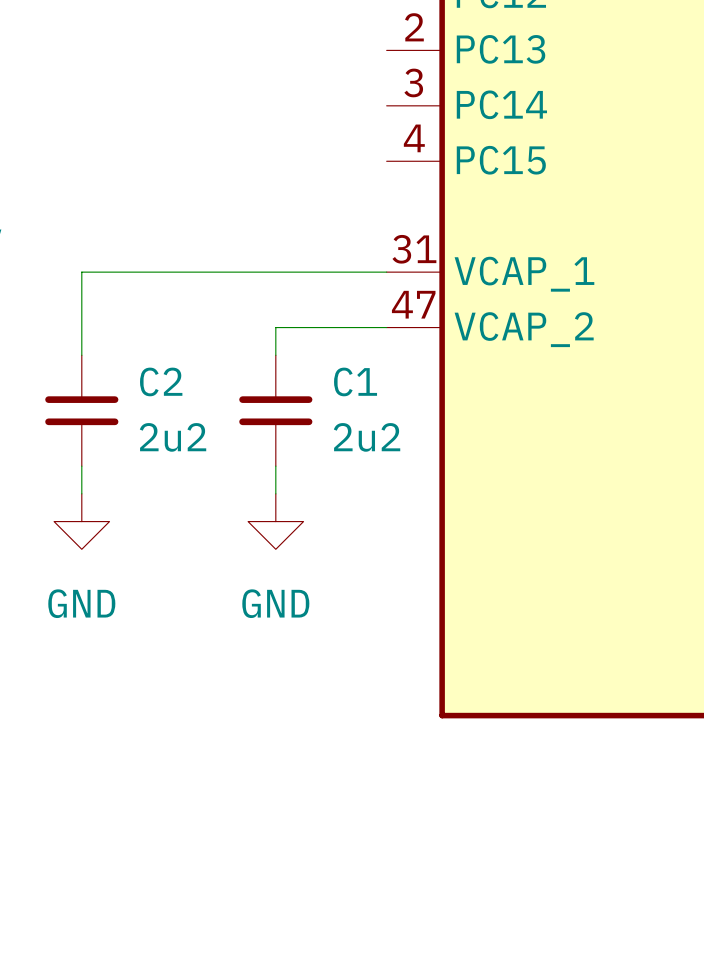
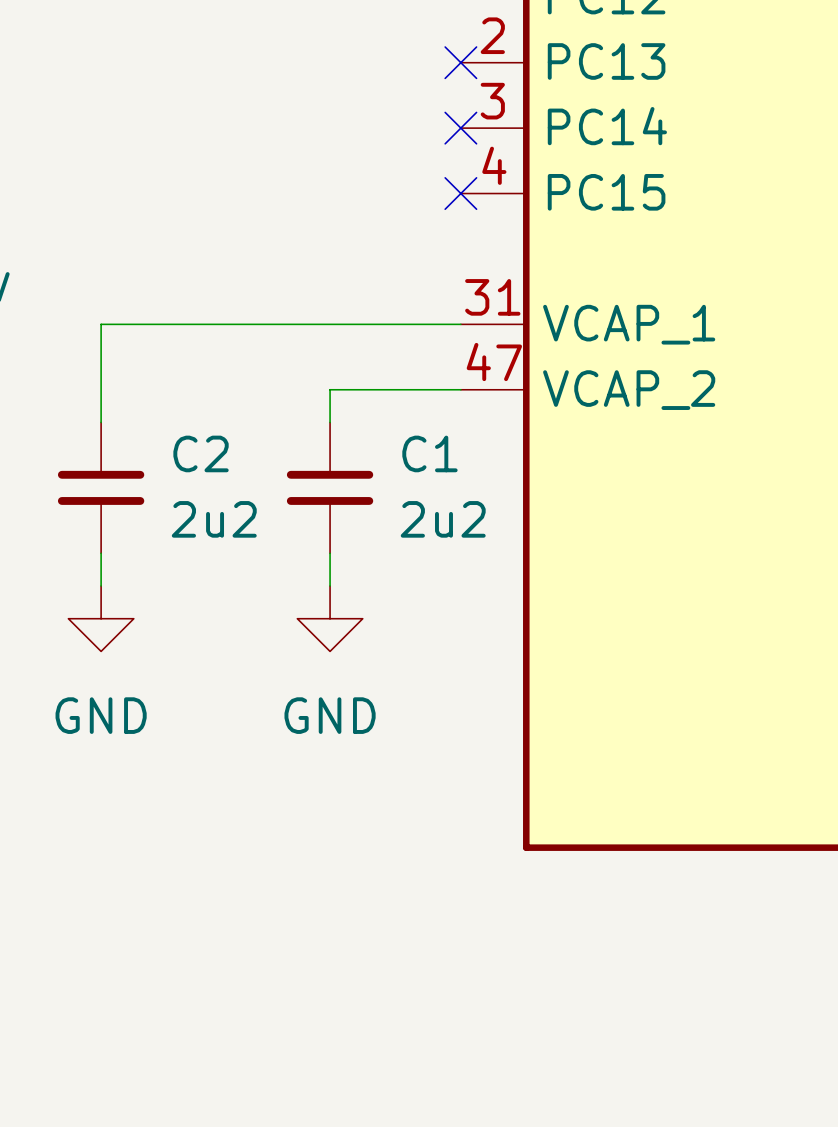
no-connect mark: none -> (460, 62)
no-connect mark: none -> (460, 128)
no-connect mark: none -> (460, 193)

